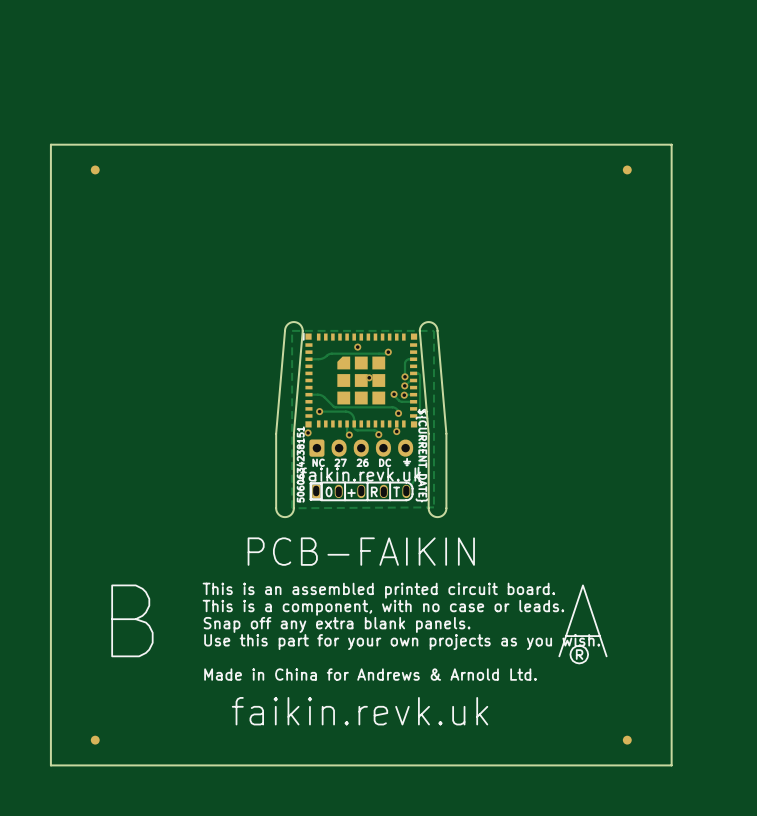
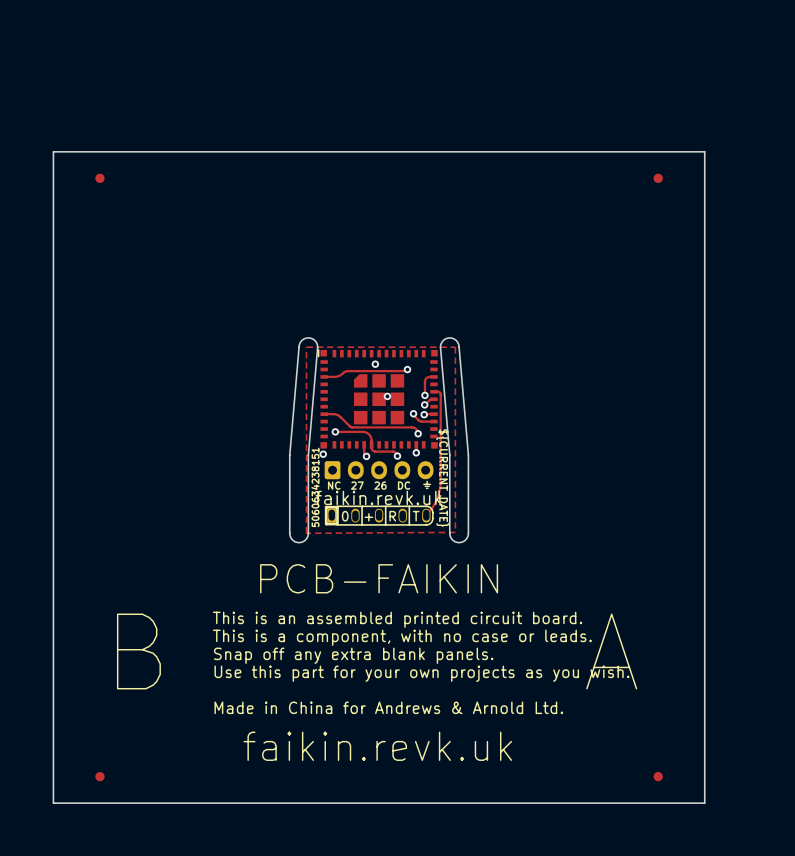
text: ® (579, 654) -> none

